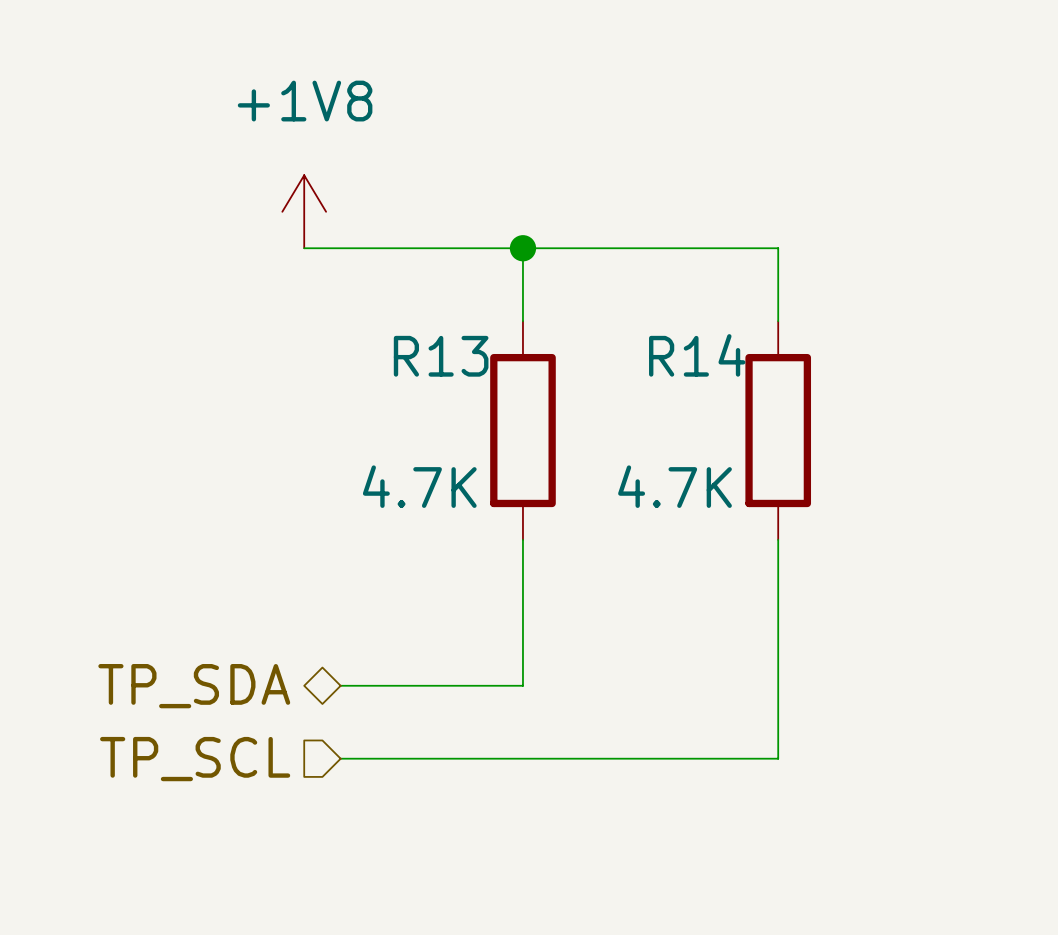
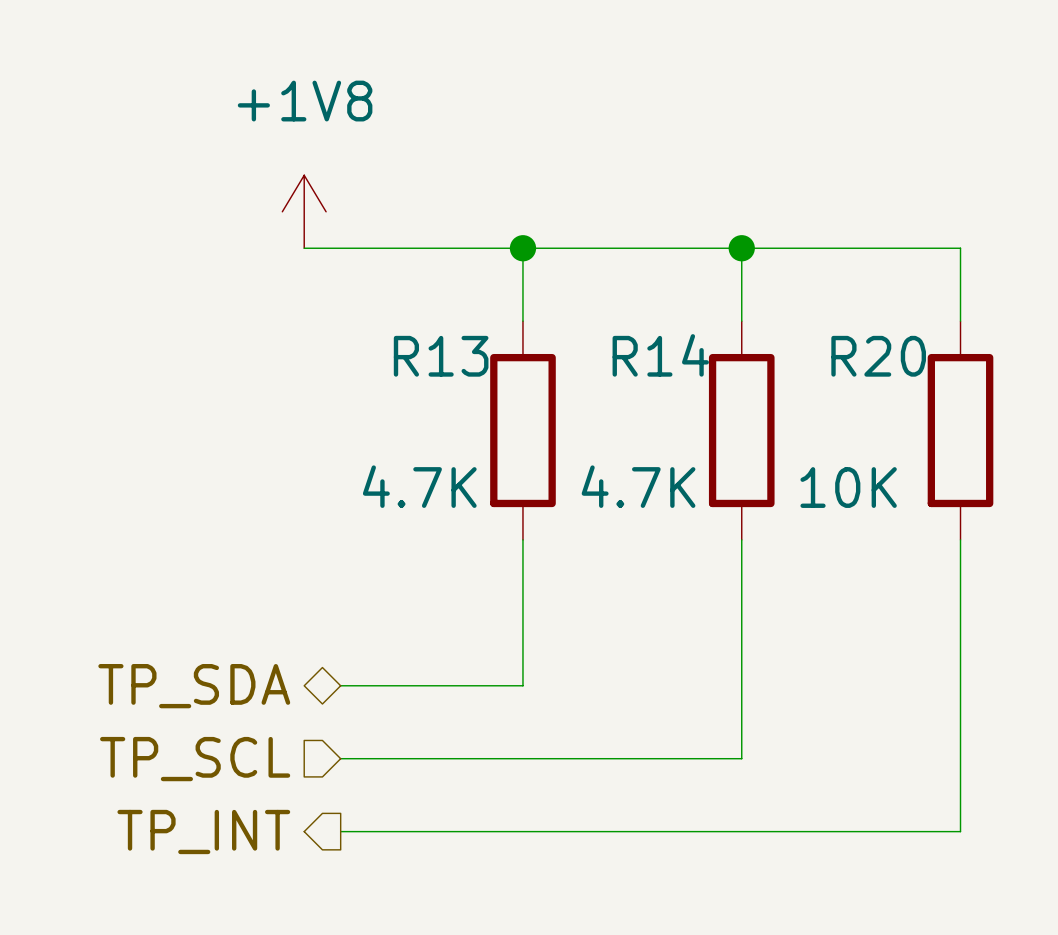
wire: none -> (741, 248) (741, 321)
junction: none -> (741, 248)
wire: (778, 248) (778, 321) -> (778, 248) (960, 248) (960, 321)
R14 position: (778, 430) -> (741, 430)
R20: none -> 10K (960, 430)
wire: (778, 539) (778, 758) (741, 758) -> (741, 539) (741, 758)
wire: none -> (960, 539) (960, 831) (340, 831)
hierarchical label: none -> TP_INT (203, 831)

